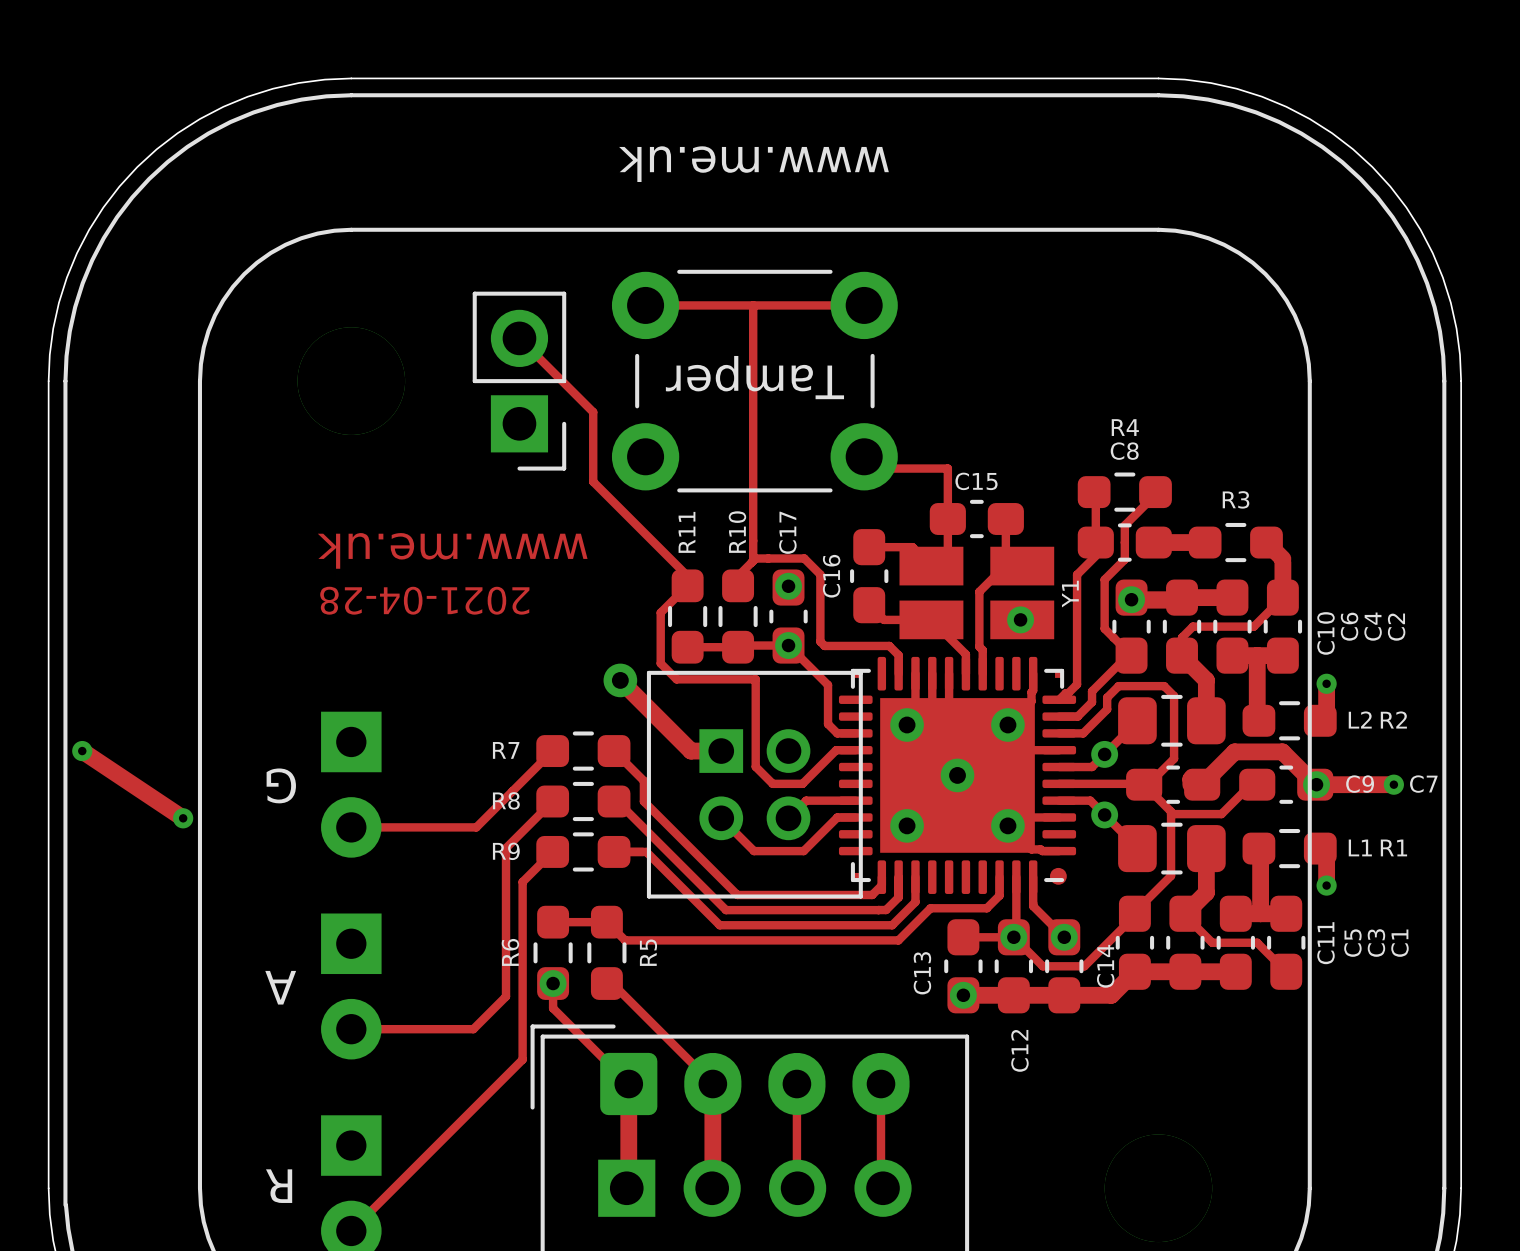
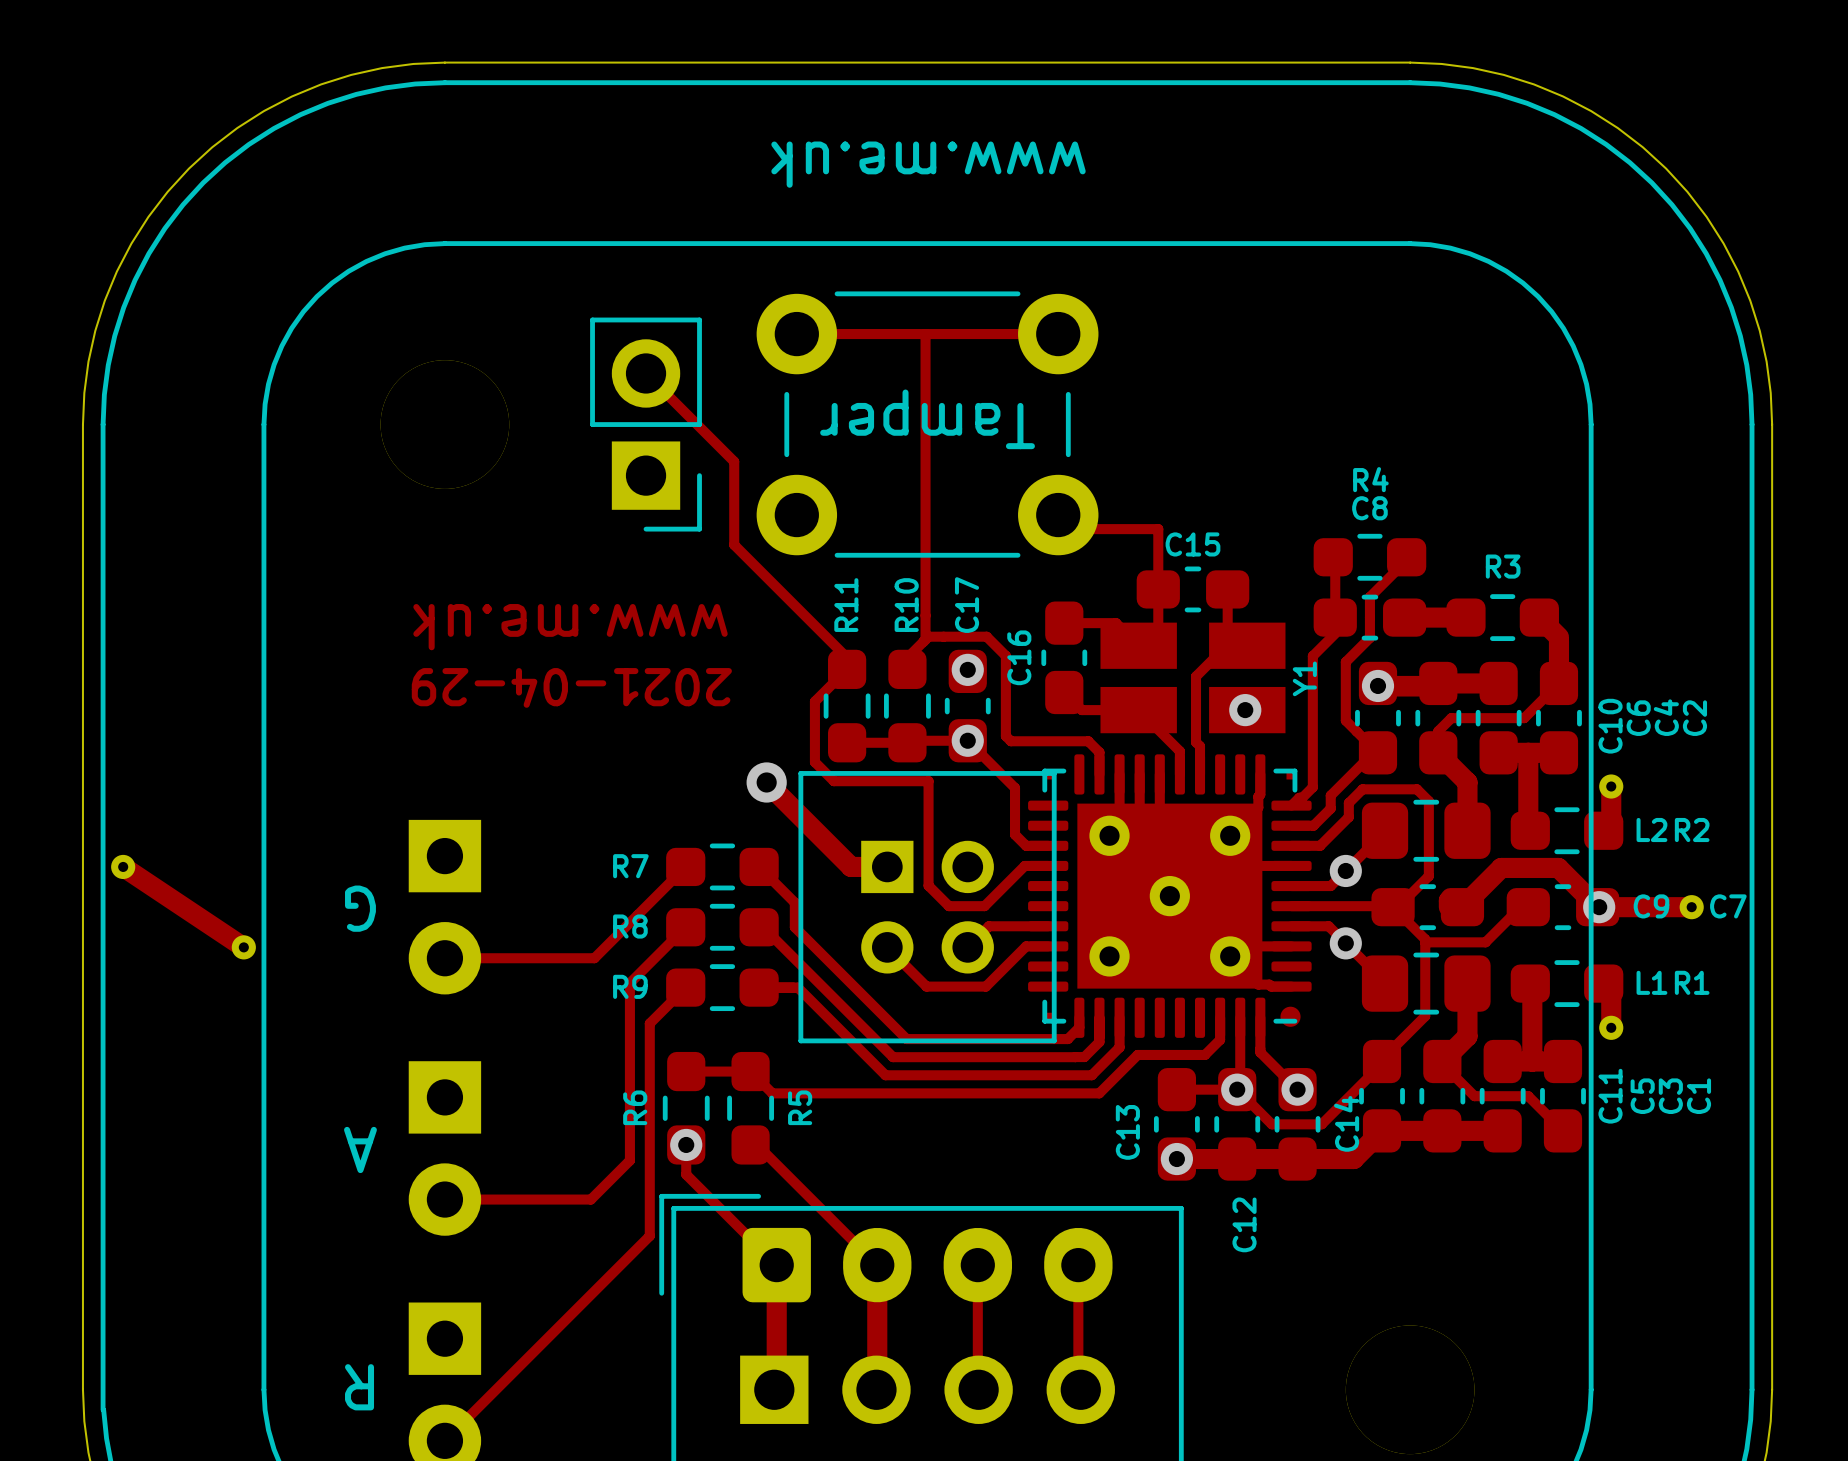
text: 2021-04-28 (424, 600) -> 2021-04-29 (571, 687)

